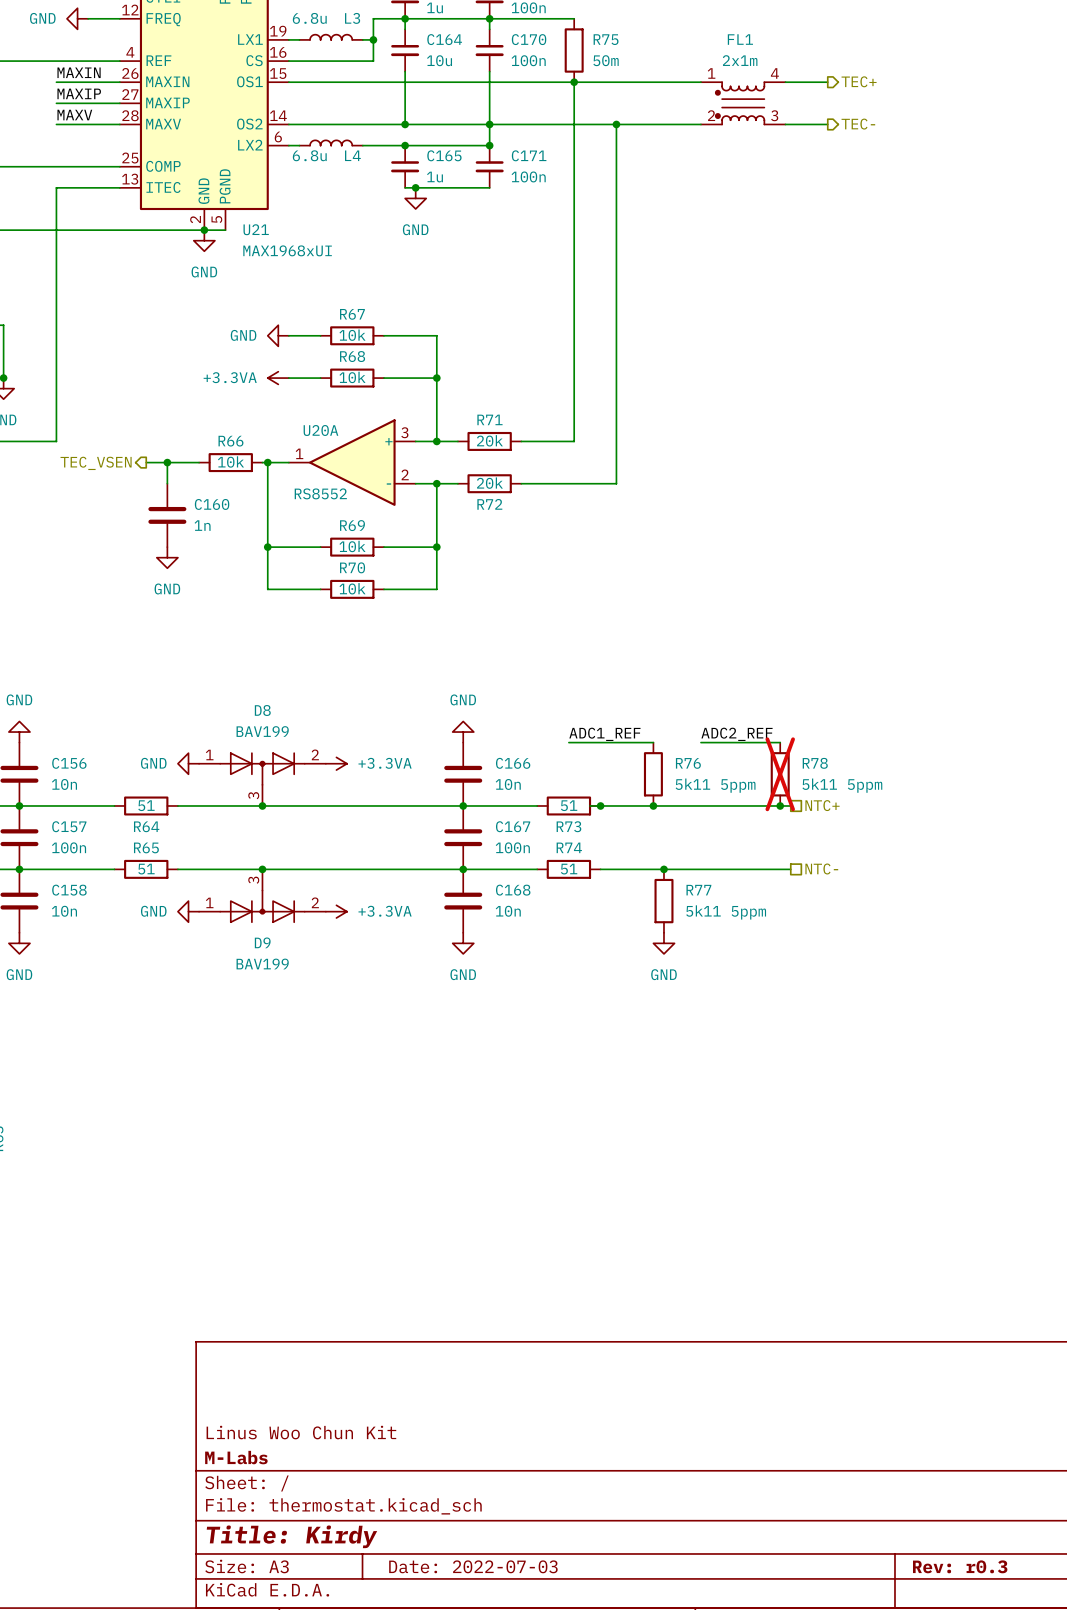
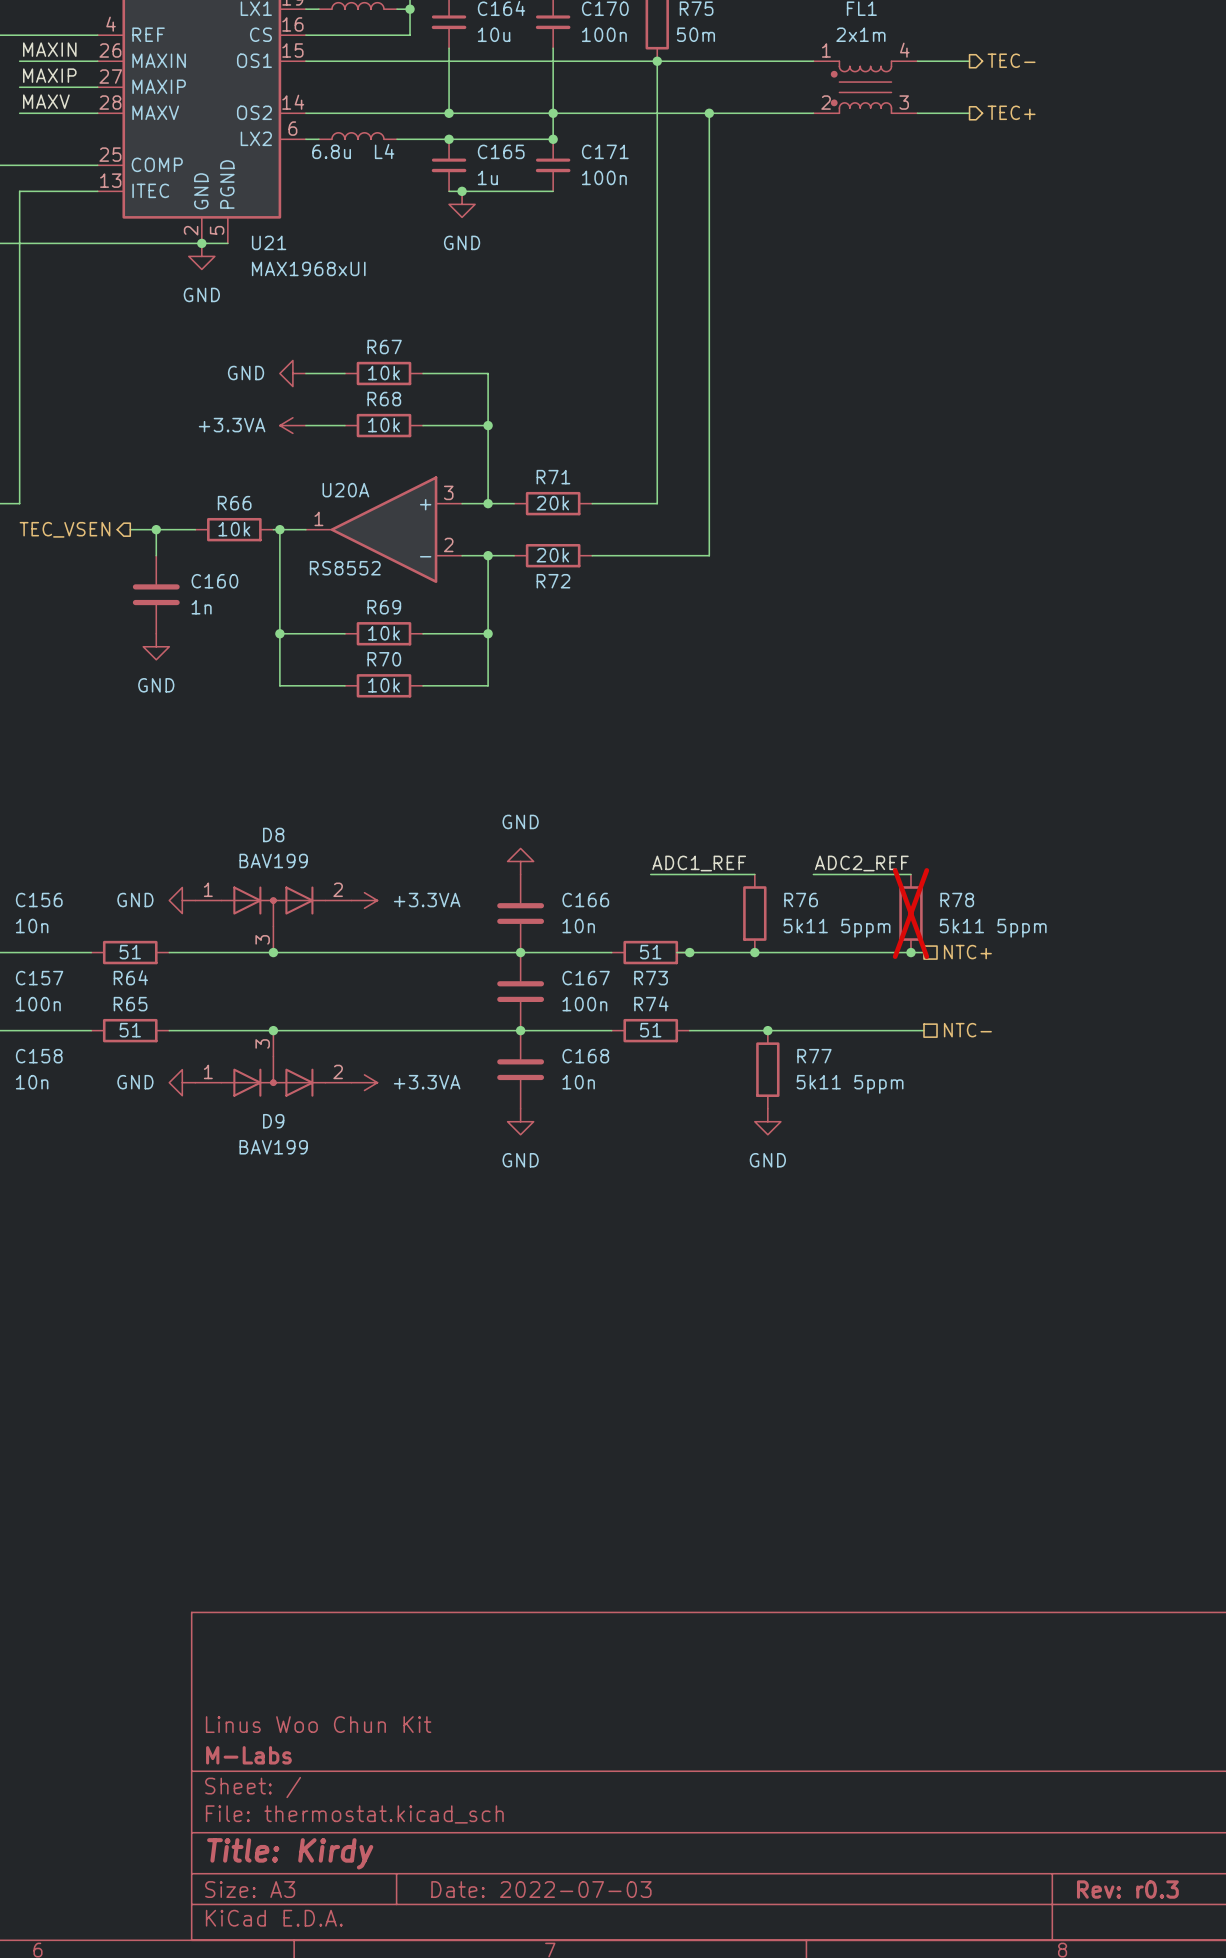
hierarchical label: TEC+ (859, 81) -> TEC- (1011, 60)
hierarchical label: TEC- (858, 124) -> TEC+ (1011, 112)

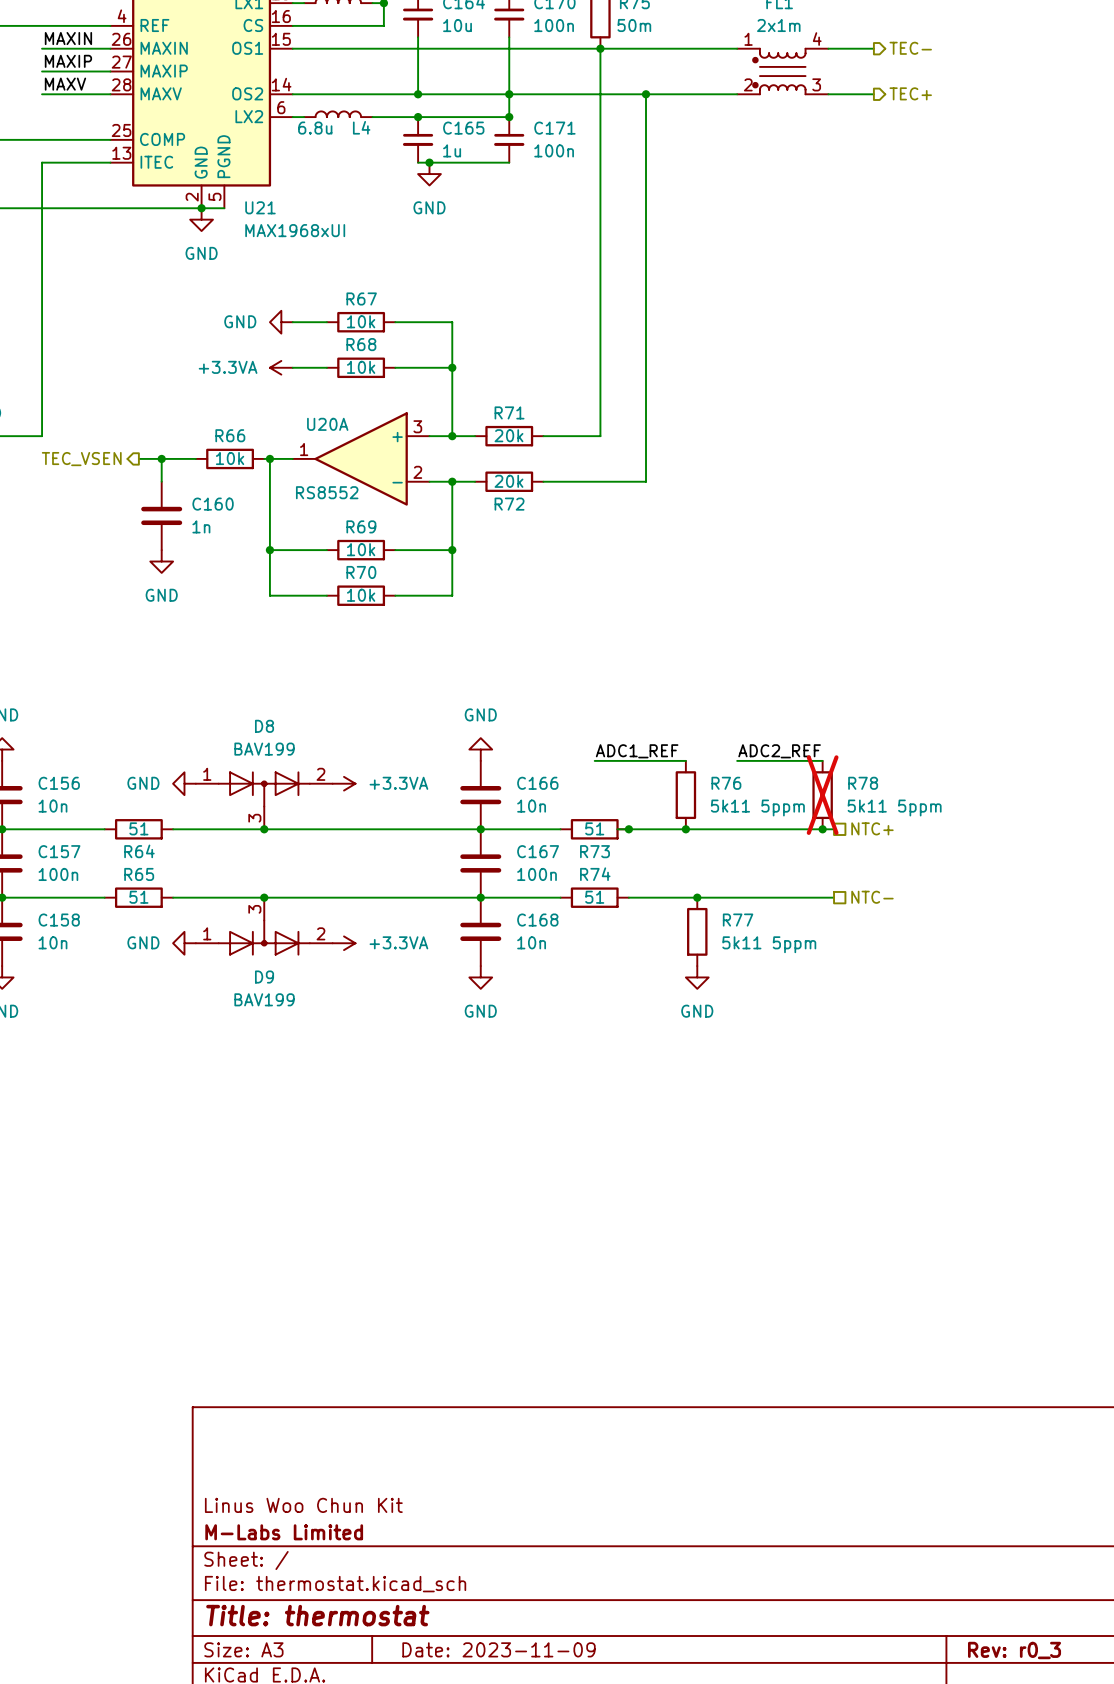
title block: M-Labs (248, 1755) -> M-Labs Limited (284, 1532)
title block: Title: Kirdy (290, 1853) -> Title: thermostat (317, 1615)
title block: Date: 2022-07-03 (541, 1889) -> Date: 2023-11-09 (498, 1649)
title block: Rev: r0.3 (1127, 1889) -> Rev: r0_3 (1014, 1650)

